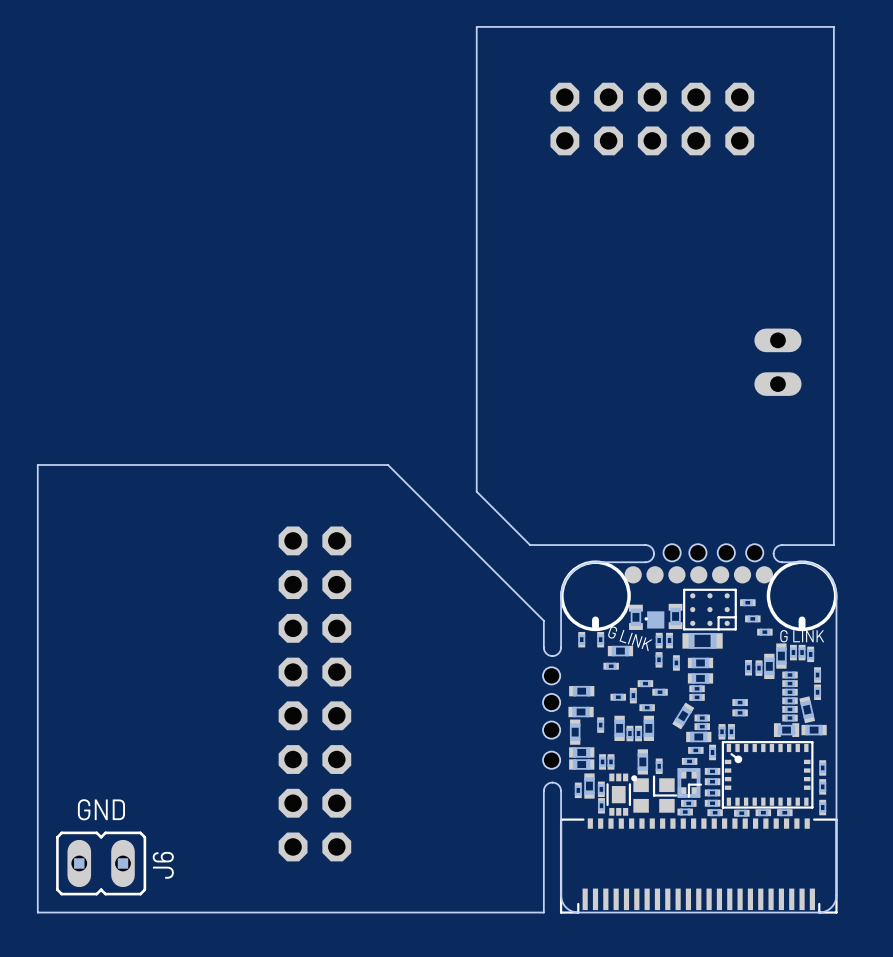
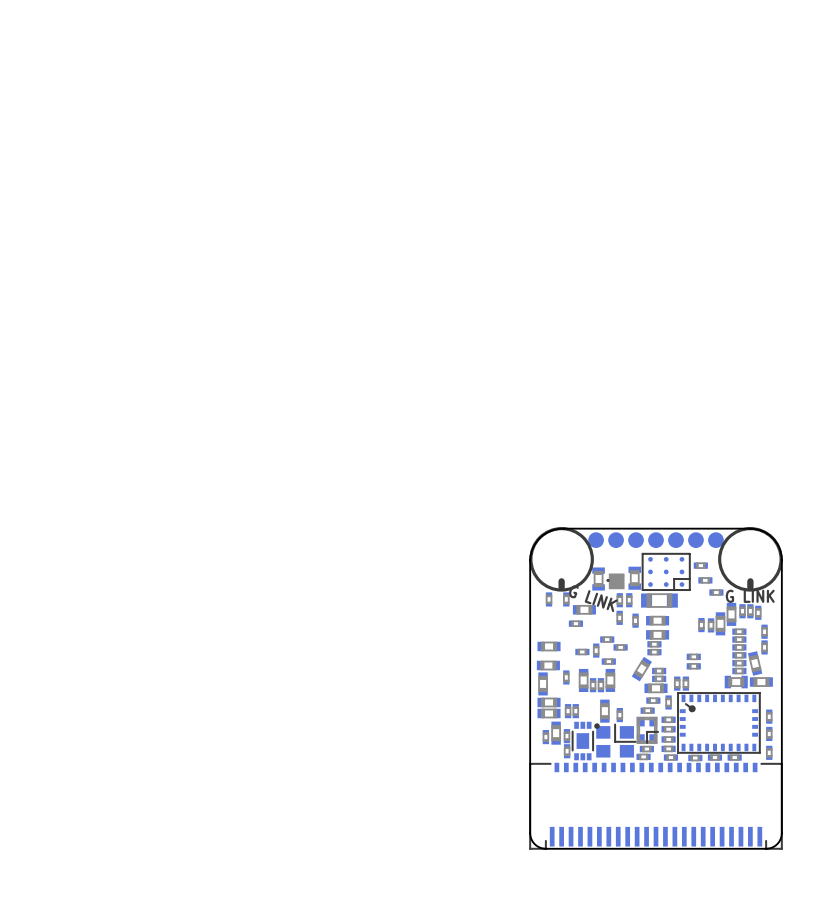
part: (652, 119) -> none
part: (777, 362) -> none
hole: (672, 552) -> none
hole: (697, 552) -> none
hole: (726, 552) -> none
hole: (754, 552) -> none
board edge: (782, 562) (776, 559) (773, 554) (775, 548) (780, 545) (833, 545) (833, 26) (476, 26) (476, 491) (530, 545) (646, 545) (651, 547) (654, 553) (651, 559) (645, 562) -> (732, 528) (607, 528)
board edge: (561, 647) (555, 655) (546, 653) (543, 648) (543, 620) (388, 465) (37, 465) (37, 912) (543, 912) (543, 790) (546, 785) (552, 782) (558, 785) (561, 791) -> (530, 606) (530, 737)
hole: (551, 675) -> none
part: (314, 693) -> none
hole: (551, 702) -> none
hole: (551, 730) -> none
hole: (551, 760) -> none
text: GND (101, 809) -> none
J6: (101, 863) -> none

